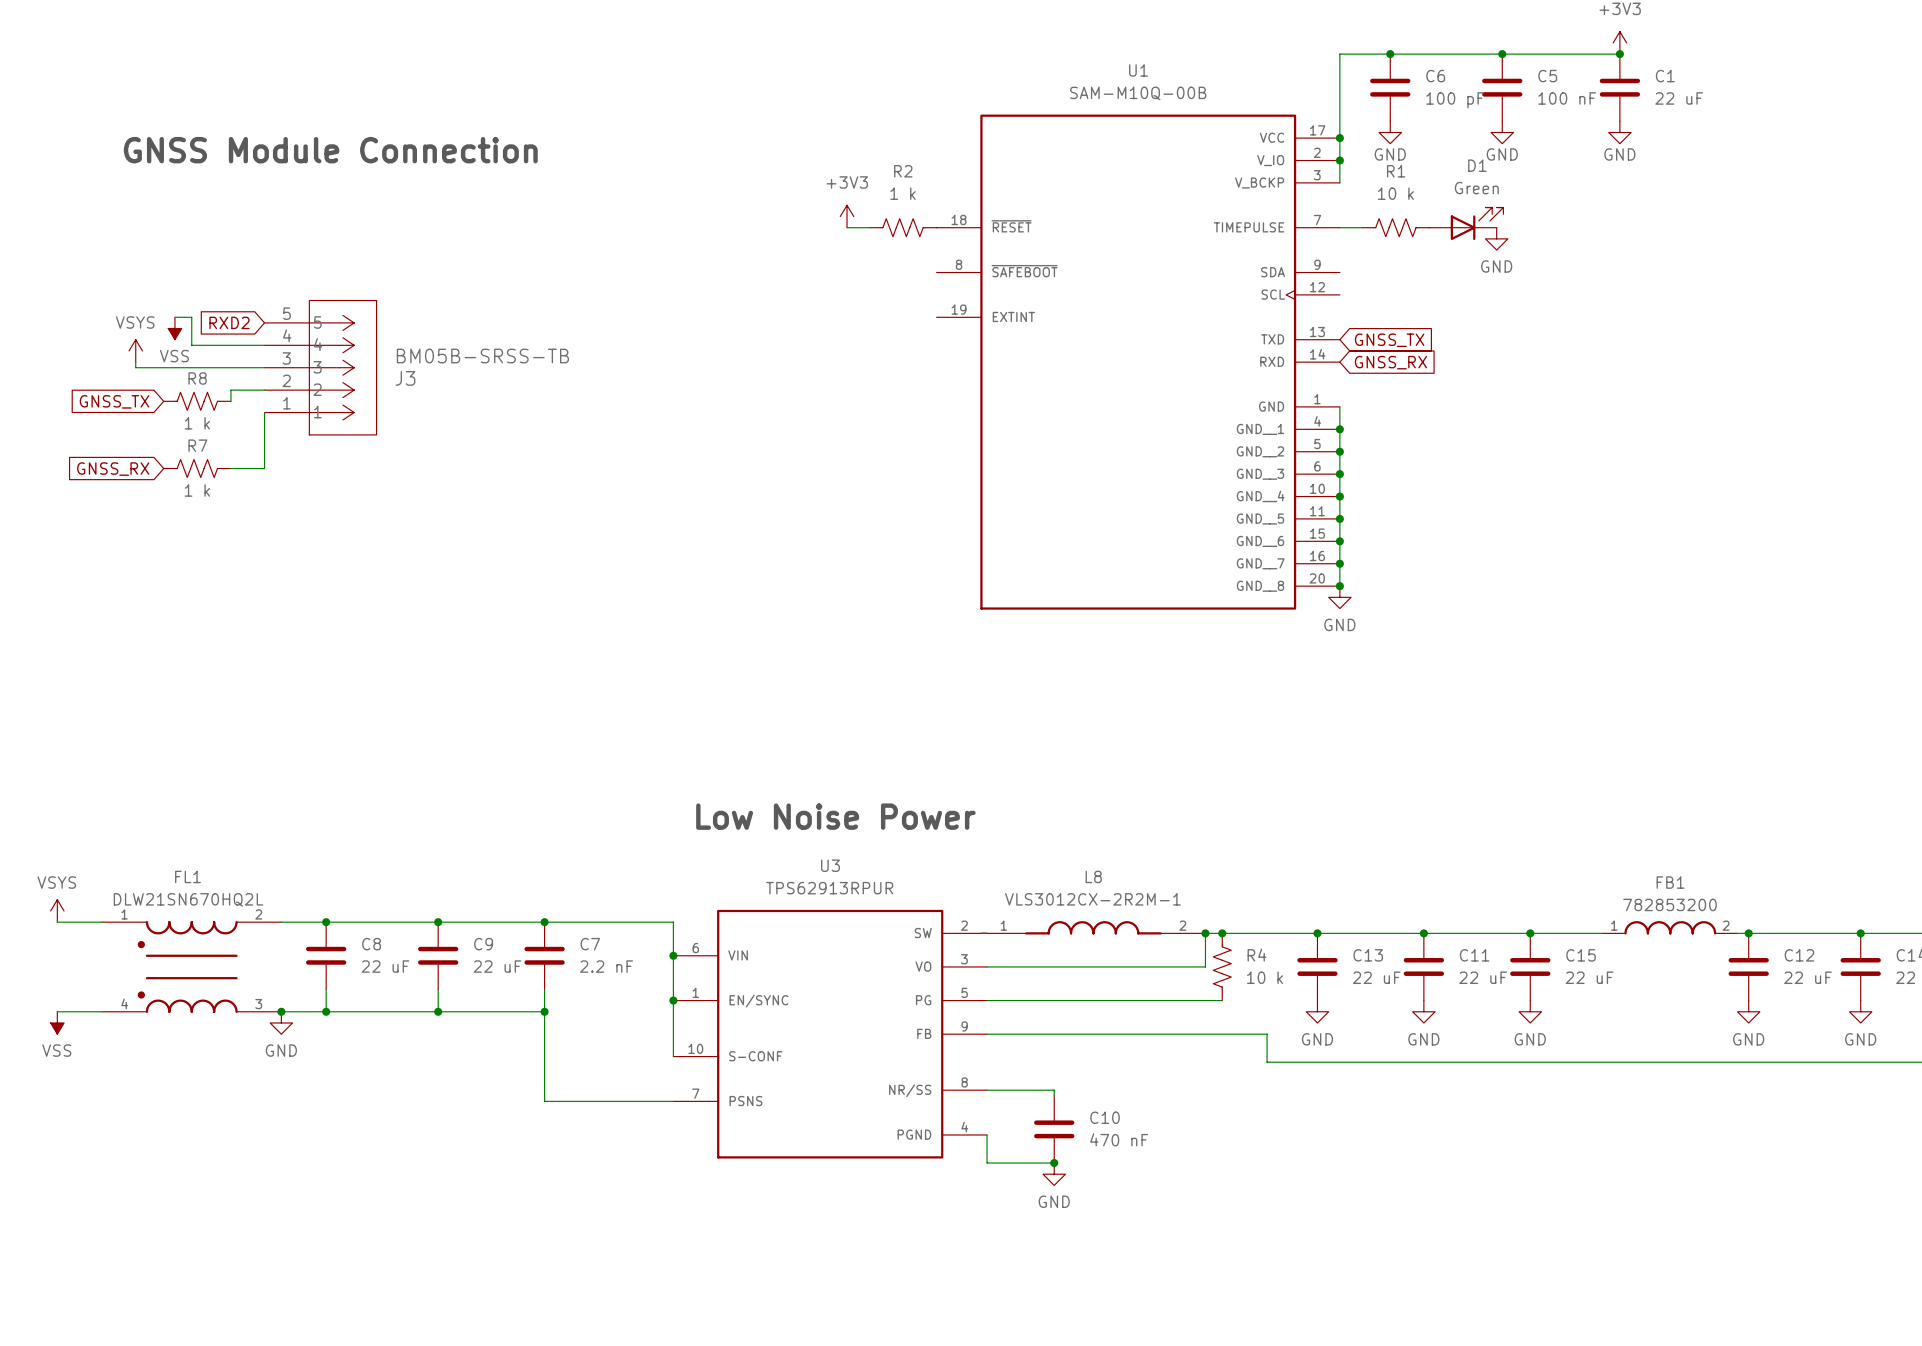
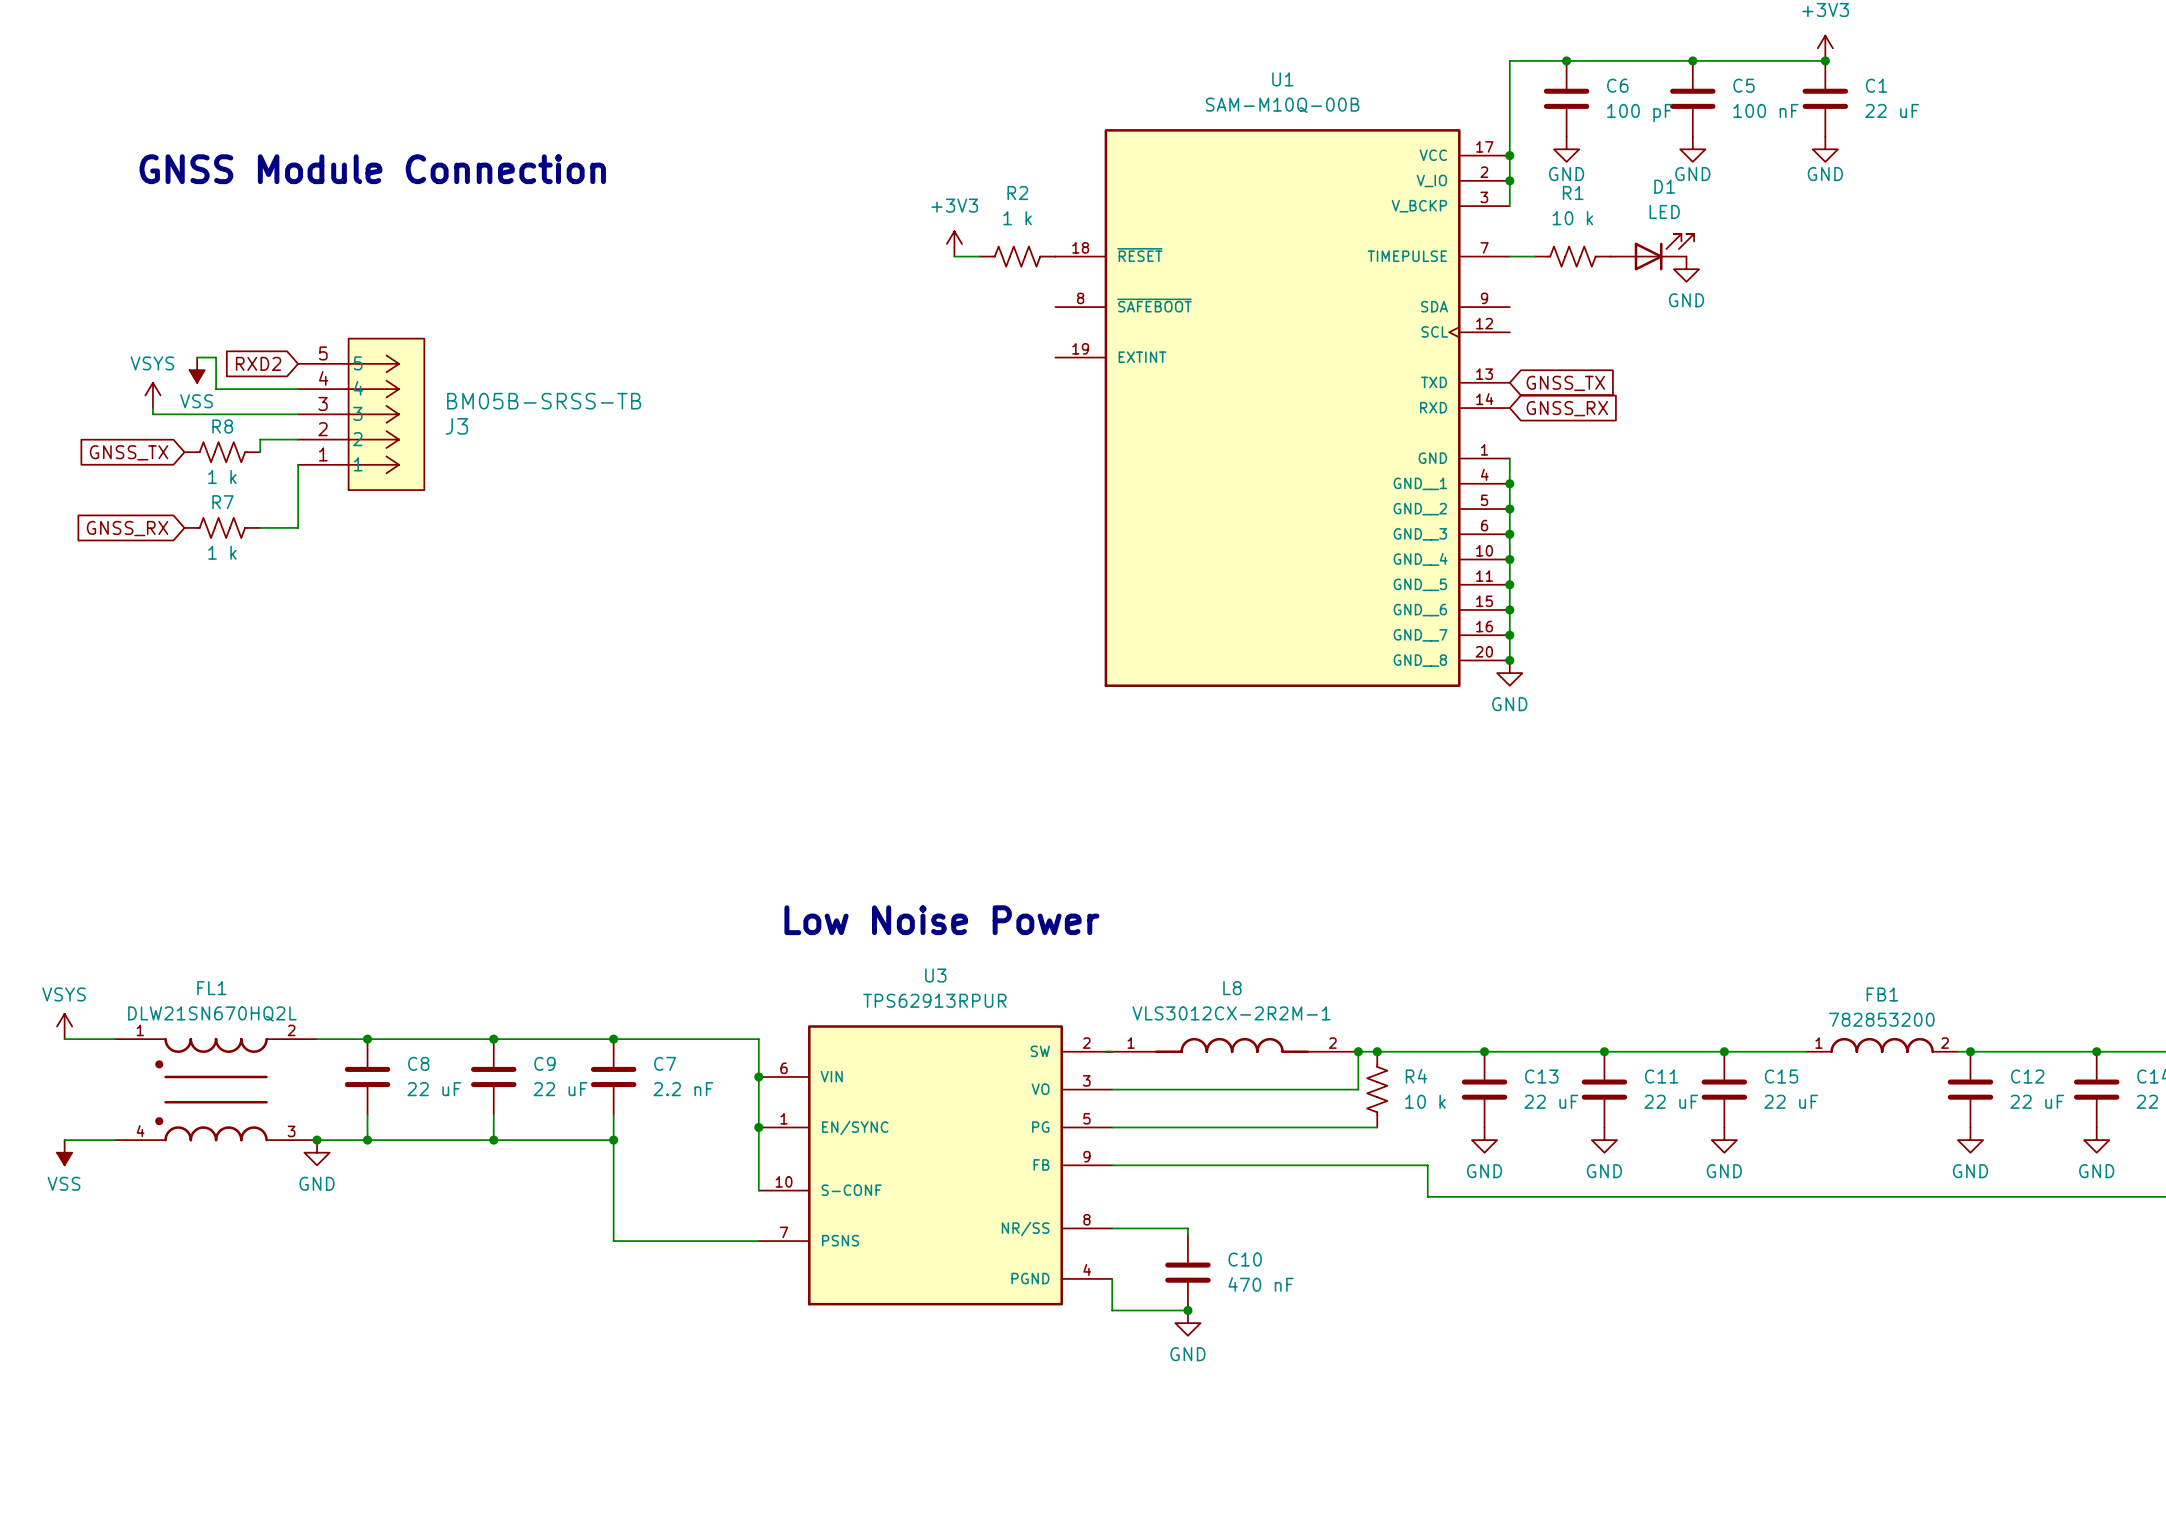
D1 value: Green (1476, 188) -> LED (1664, 211)

